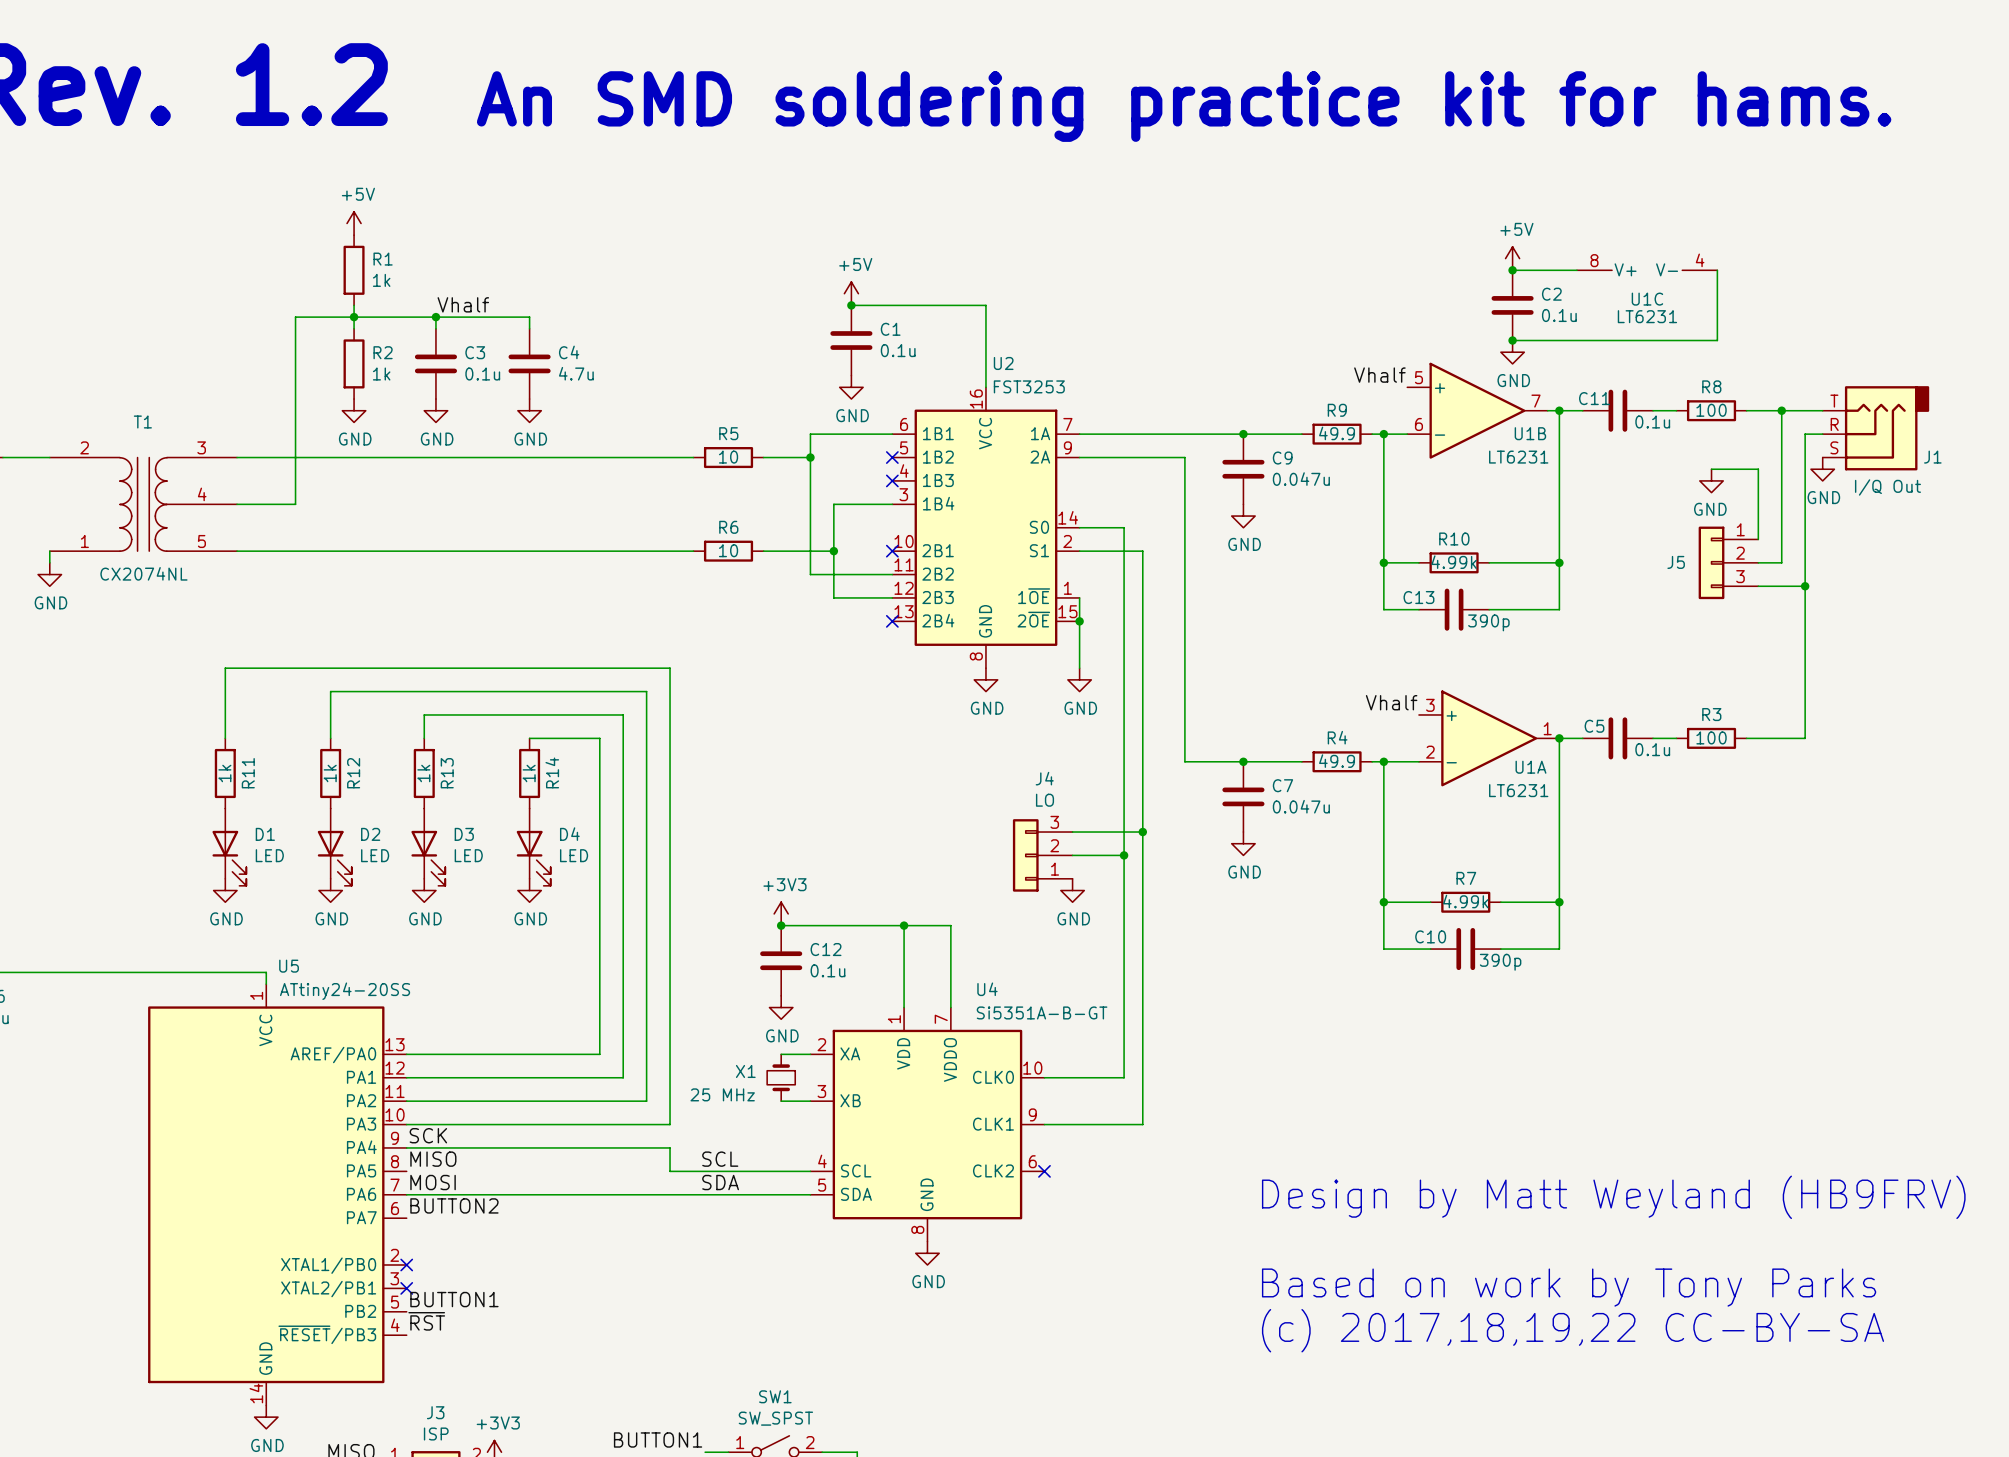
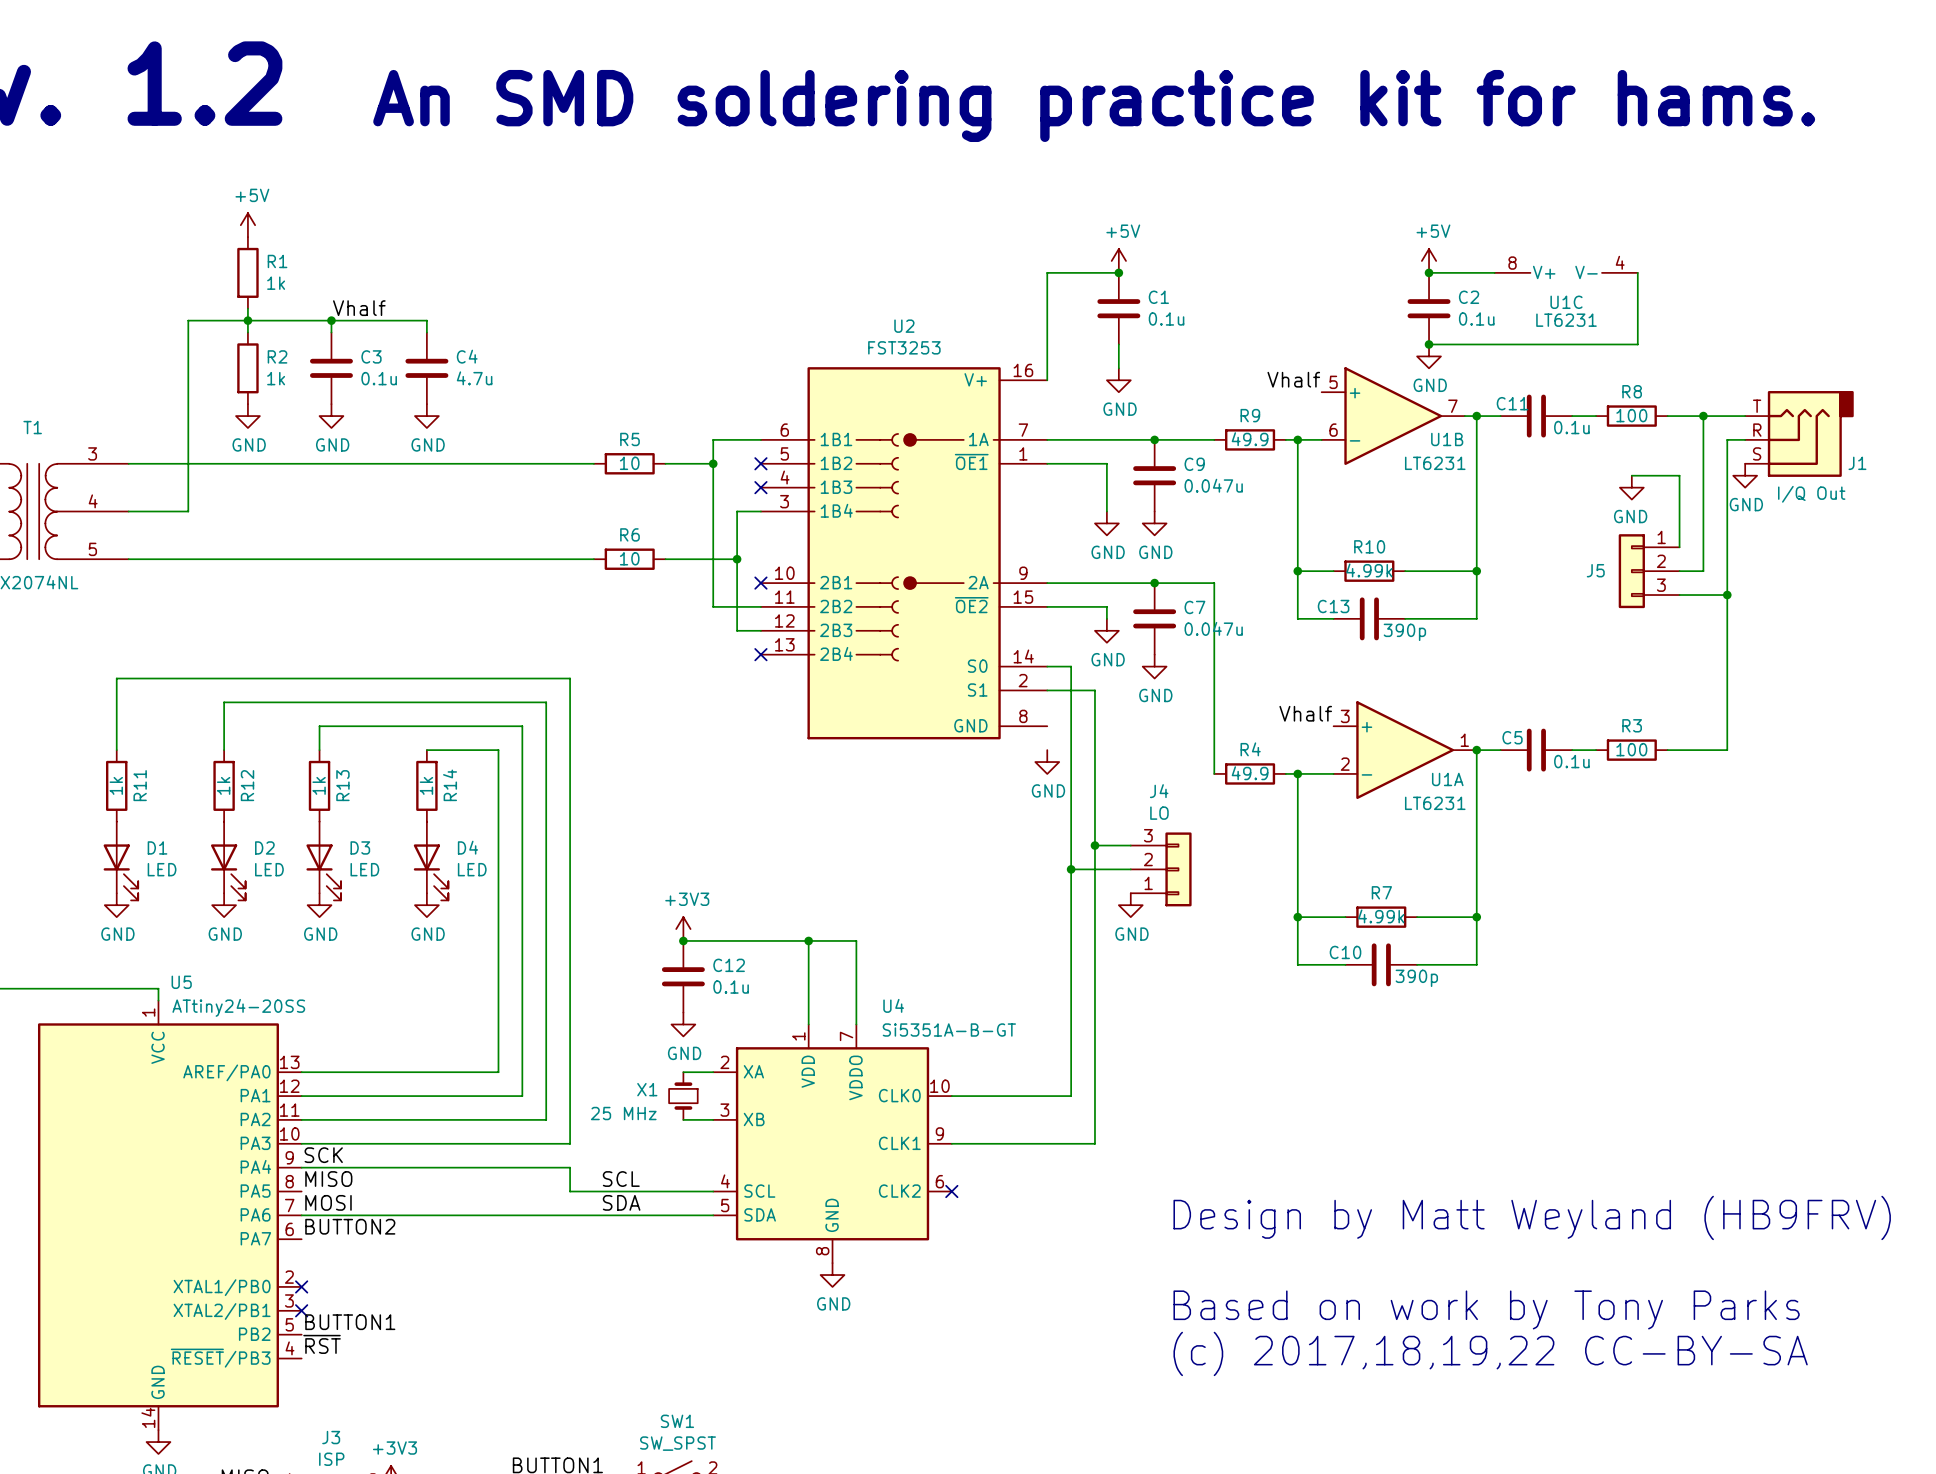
power symbol: none -> +5V (1118, 260)
wire: none -> (1118, 272) (1047, 272) (1047, 380)
junction: none -> (1118, 272)
power symbol: +5V (851, 293) -> none
wire: (851, 305) (985, 305) (985, 387) -> none
junction: (851, 305) -> none
C1 position: (851, 340) -> (1118, 308)
wire: none -> (1118, 344) (1118, 368)
U2 name position: U2 (1003, 363) -> U2 (904, 326)
power symbol: none -> GND (1118, 380)
U2 value position: FST3253 (1029, 386) -> FST3253 (904, 347)
power symbol: GND (851, 387) -> none
U2 symbol: [892, 387, 1080, 669] -> [760, 367, 1048, 740]
no-connect mark: none -> (760, 463)
no-connect mark: (892, 457) -> none
wire: (1184, 457) (1184, 679) -> (1094, 463) (1106, 463) (1106, 511)
no-connect mark: none -> (760, 487)
no-connect mark: (892, 480) -> none
power symbol: none -> GND (1106, 523)
wire: (1079, 527) (1124, 527) (1124, 1077) -> (1047, 666) (1071, 666) (1071, 1096) (1032, 1096)
no-connect mark: (892, 551) -> none
wire: (1079, 551) (1142, 551) (1142, 1124) -> (1094, 773) (1094, 1143) (1052, 1143)
wire: (810, 574) (892, 574) -> (713, 583) (713, 606) (737, 606) (737, 630) (760, 630)
no-connect mark: none -> (760, 583)
junction: none -> (1154, 583)
wire: none -> (1047, 606) (1106, 606) (1106, 618)
no-connect mark: (892, 621) -> none
junction: (1079, 621) -> none
power symbol: none -> GND (1106, 630)
no-connect mark: none -> (760, 654)
power symbol: none -> GND (1154, 666)
power symbol: GND (985, 679) -> none
power symbol: GND (1079, 679) -> none
wire: none -> (1047, 690) (1094, 690)
power symbol: none -> GND (1047, 762)
wire: (1184, 761) (1301, 761) -> (1047, 583) (1214, 583) (1214, 773)
junction: (1243, 761) -> none
C7 position: (1243, 796) -> (1154, 618)
wire: (1072, 832) (1142, 832) -> none
junction: (1142, 832) -> none
wire: none -> (1094, 845) (1130, 845)
junction: none -> (1094, 845)
power symbol position: GND (1243, 843) -> GND (1130, 905)
J4 flip: as is (1025, 855) -> left-right (1178, 869)
J4 position: (1042, 855) -> (1161, 869)
wire: (1072, 855) (1124, 855) -> none
junction: (1124, 855) -> none
wire: none -> (1071, 869) (1130, 869)
junction: none -> (1071, 869)
power symbol: GND (1072, 890) -> none

